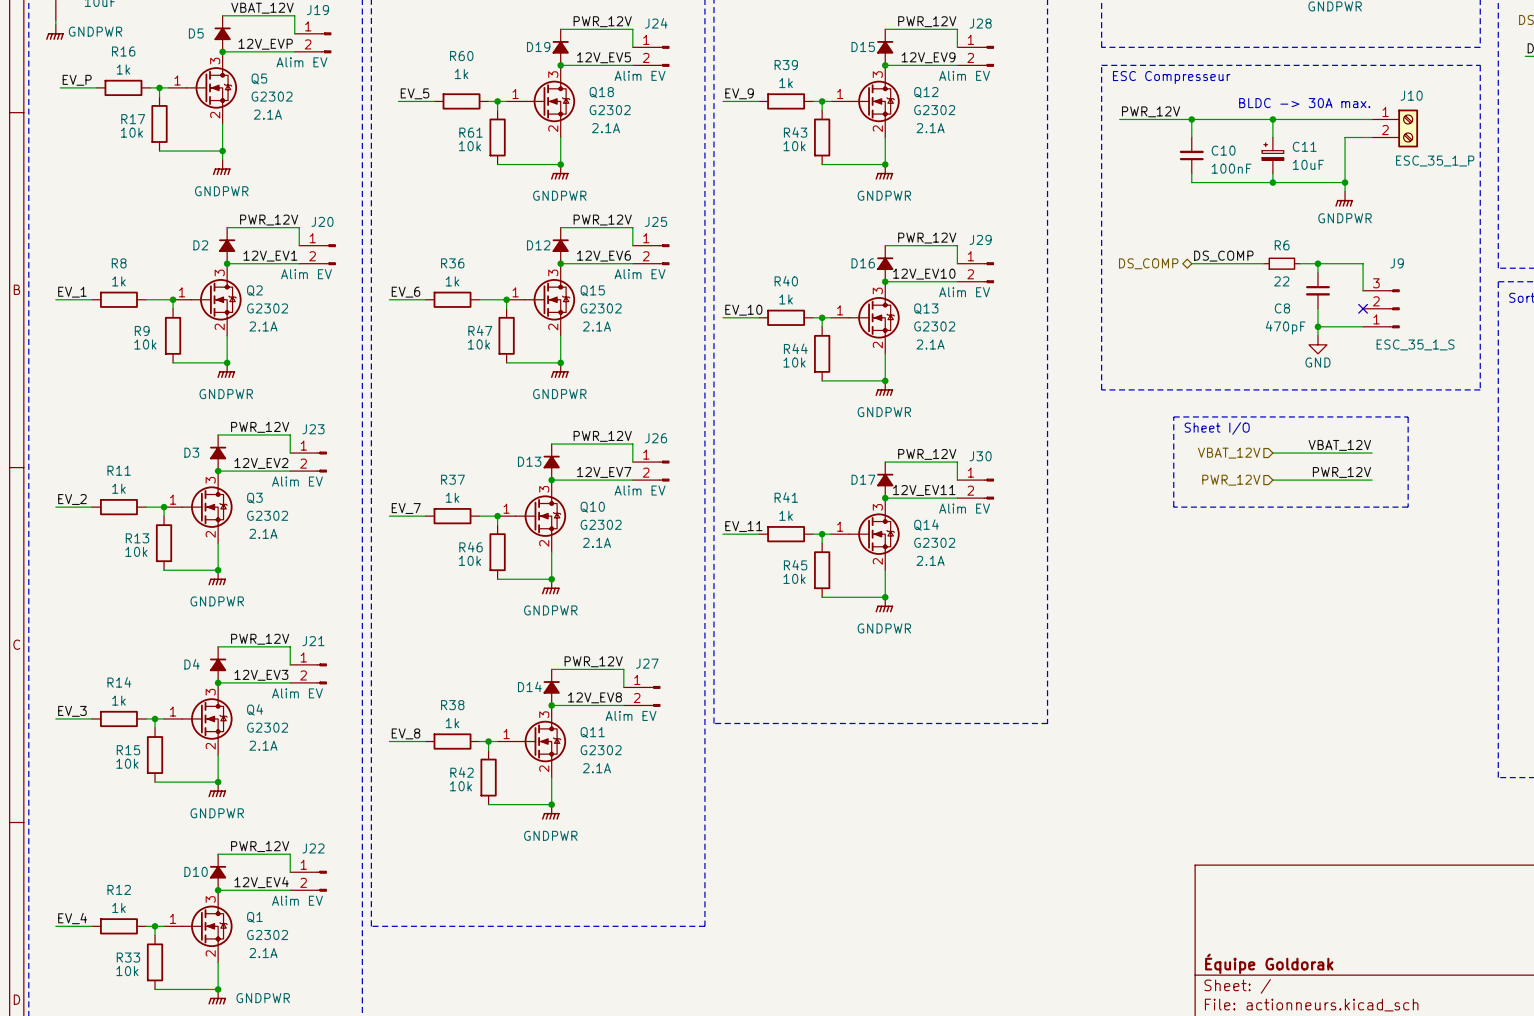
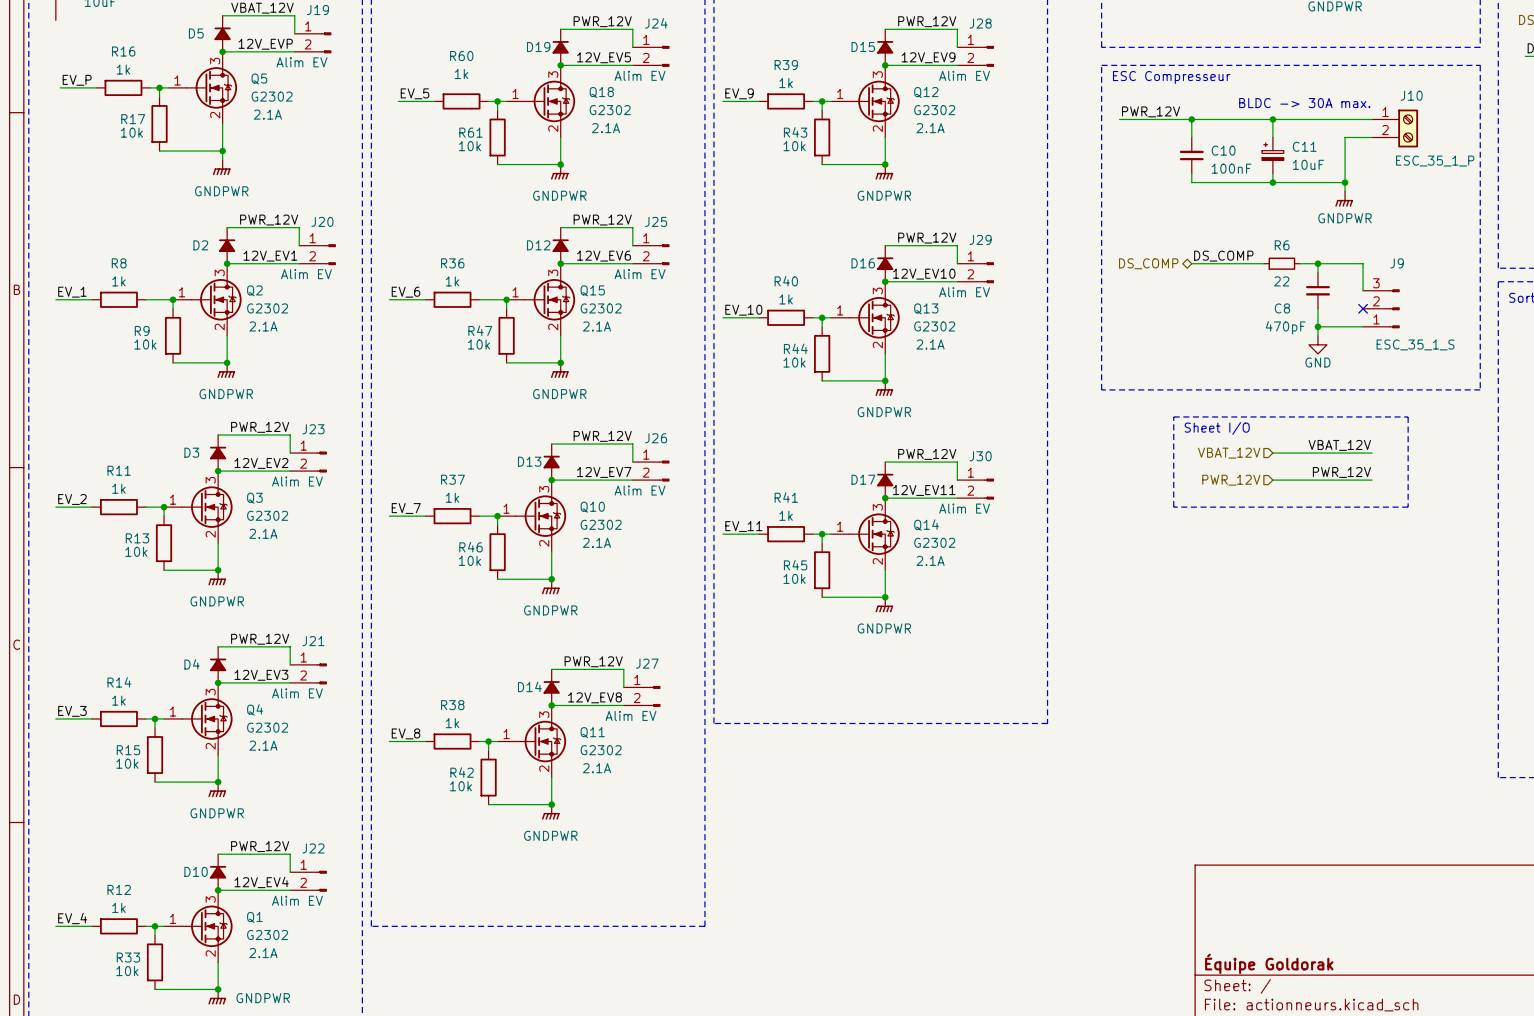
wire: (55, 20) (55, 24) -> none
power symbol: GNDPWR (54, 32) -> none

